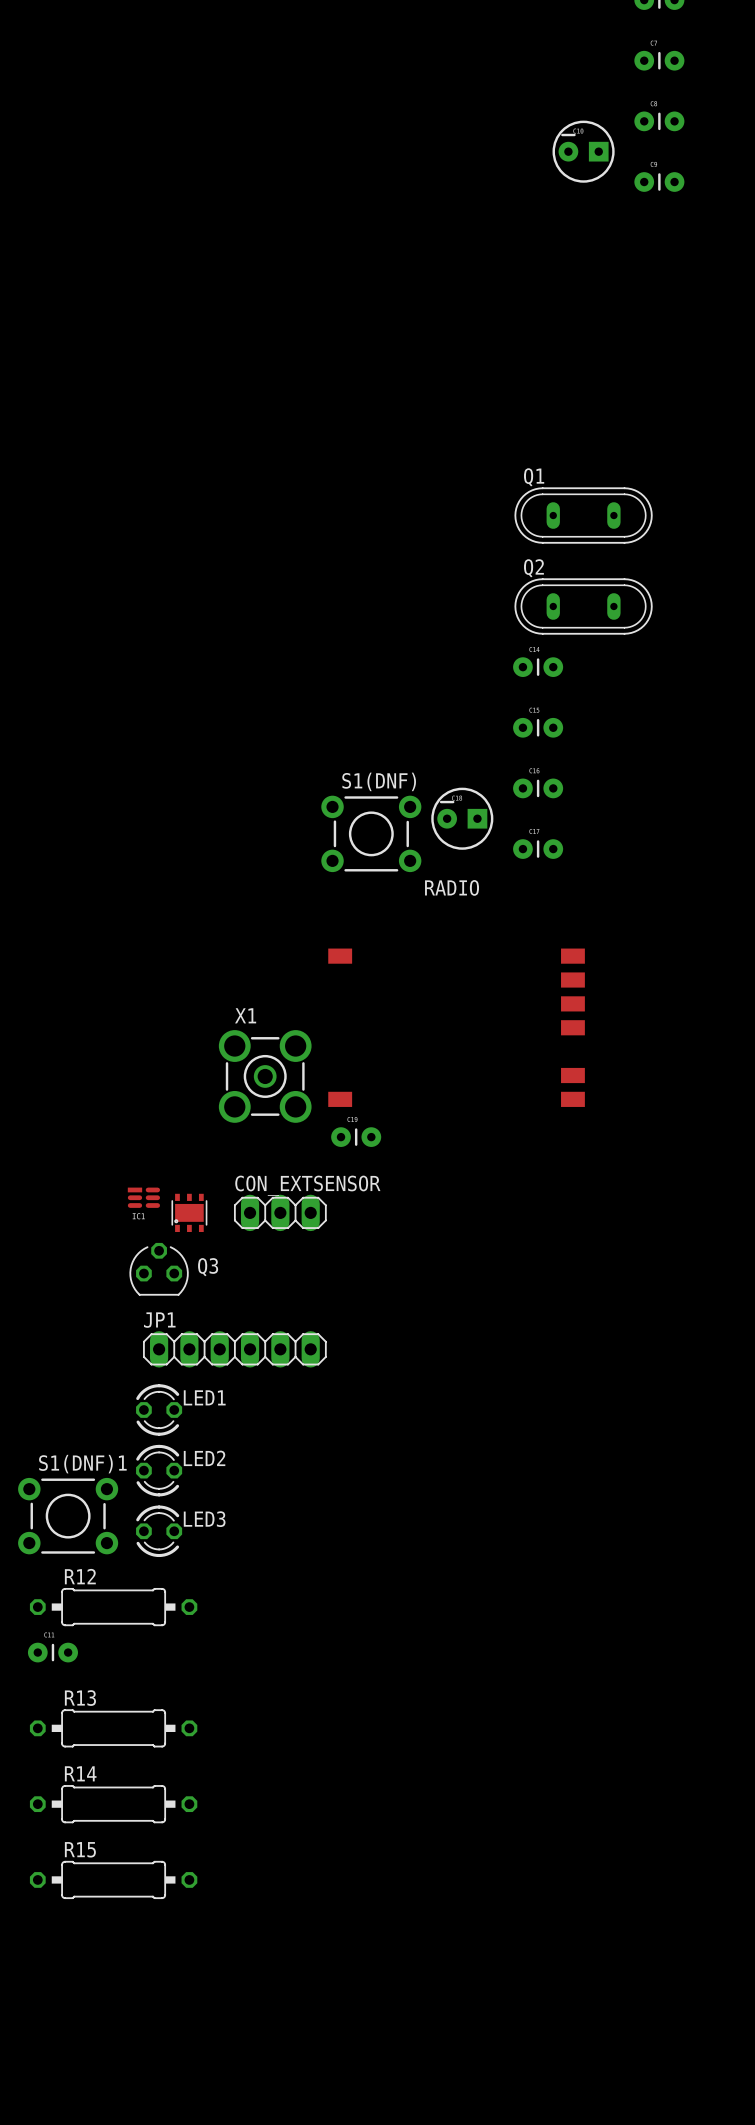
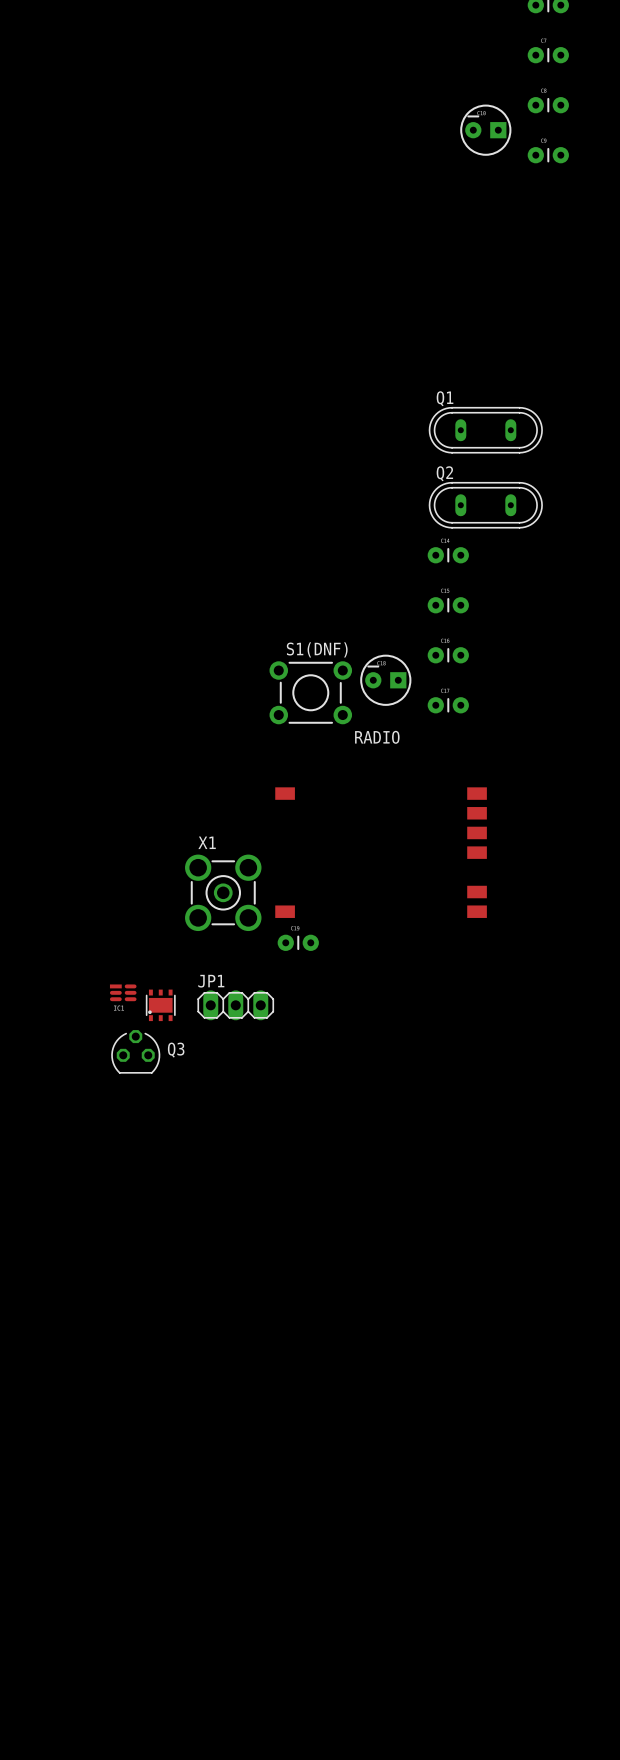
CON_EXTSENSOR name: CON_EXTSENSOR (307, 1185) -> JP1 (211, 981)
JP1: (234, 1349) -> none
LED1: (159, 1409) -> none
LED2: (159, 1470) -> none
S1(DNF)1: (68, 1516) -> none
LED3: (159, 1531) -> none
R12: (113, 1607) -> none
part: (52, 1652) -> none
R13: (113, 1728) -> none
R14: (113, 1804) -> none
R15: (113, 1879) -> none

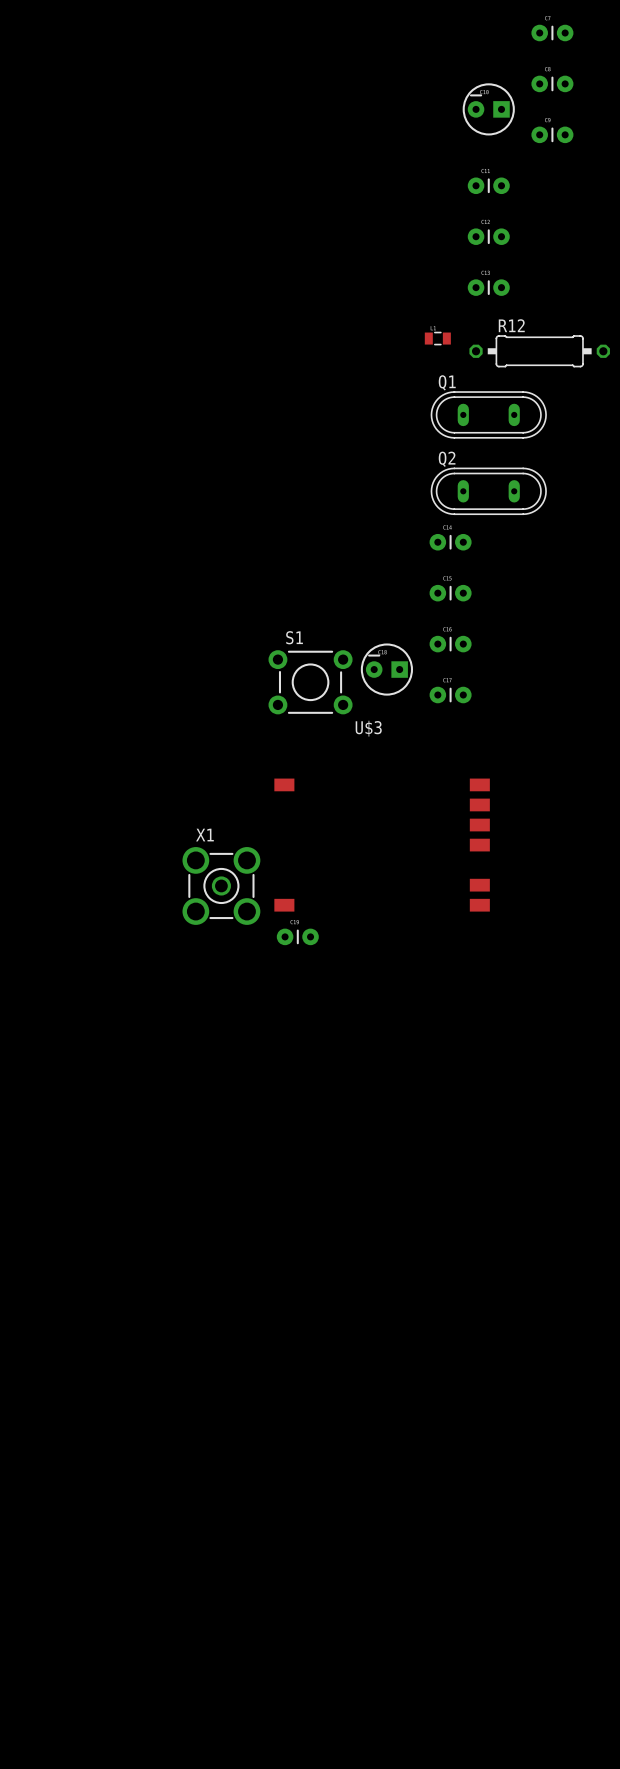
part: none -> (488, 185)
part: none -> (488, 236)
part: none -> (488, 287)
part: none -> (437, 338)
R12: none -> (539, 351)
S1(DNF) name: S1(DNF) (317, 649) -> S1 (294, 637)
RADIO name: RADIO (377, 737) -> U$3 (368, 728)
part: (123, 992) -> none
part: (160, 1005) -> none
JP1: (235, 1005) -> none
Q3: (135, 1051) -> none

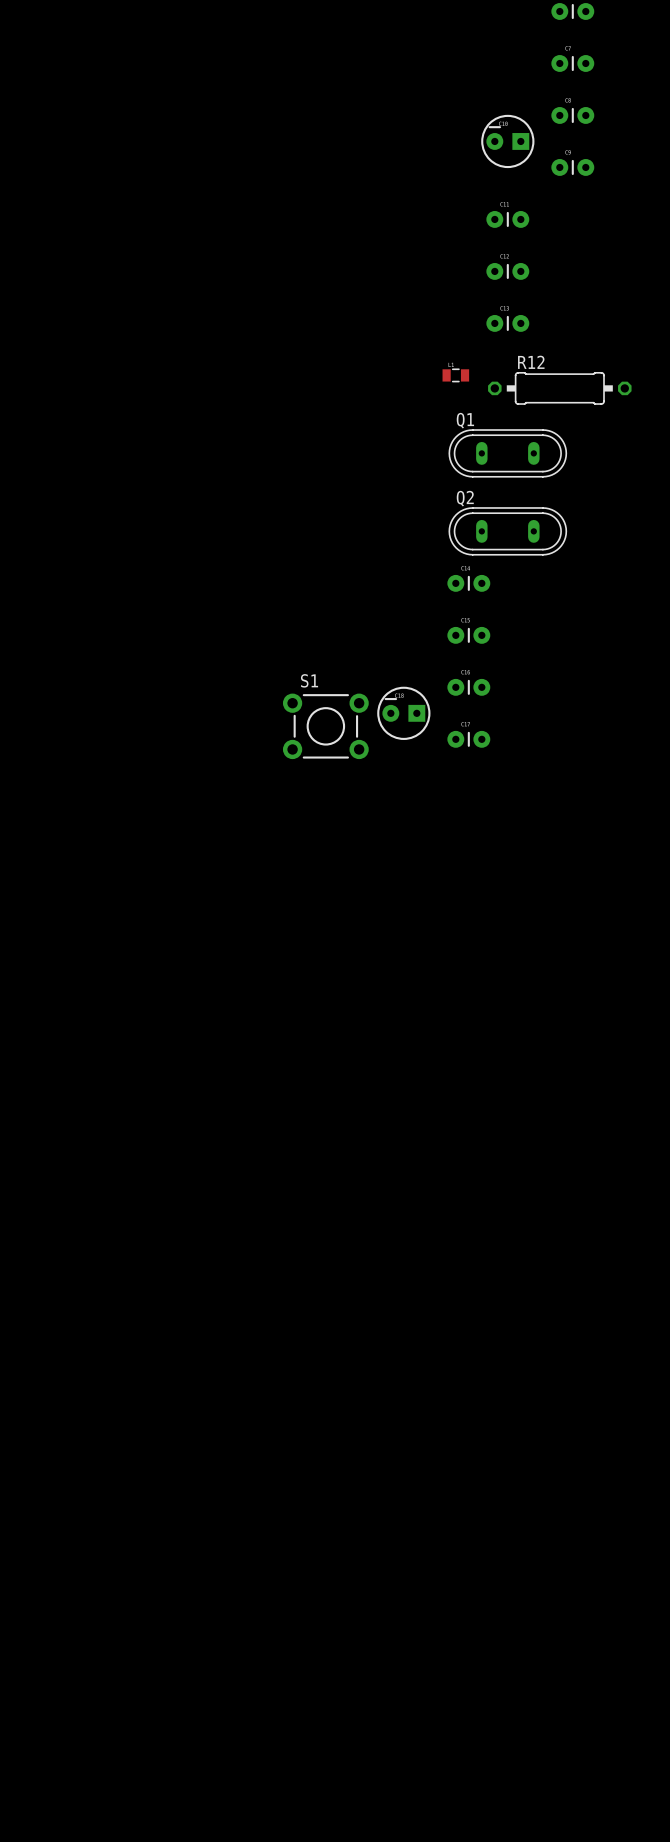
U$3: (382, 845) -> none
X1: (221, 885) -> none
part: (297, 936) -> none

